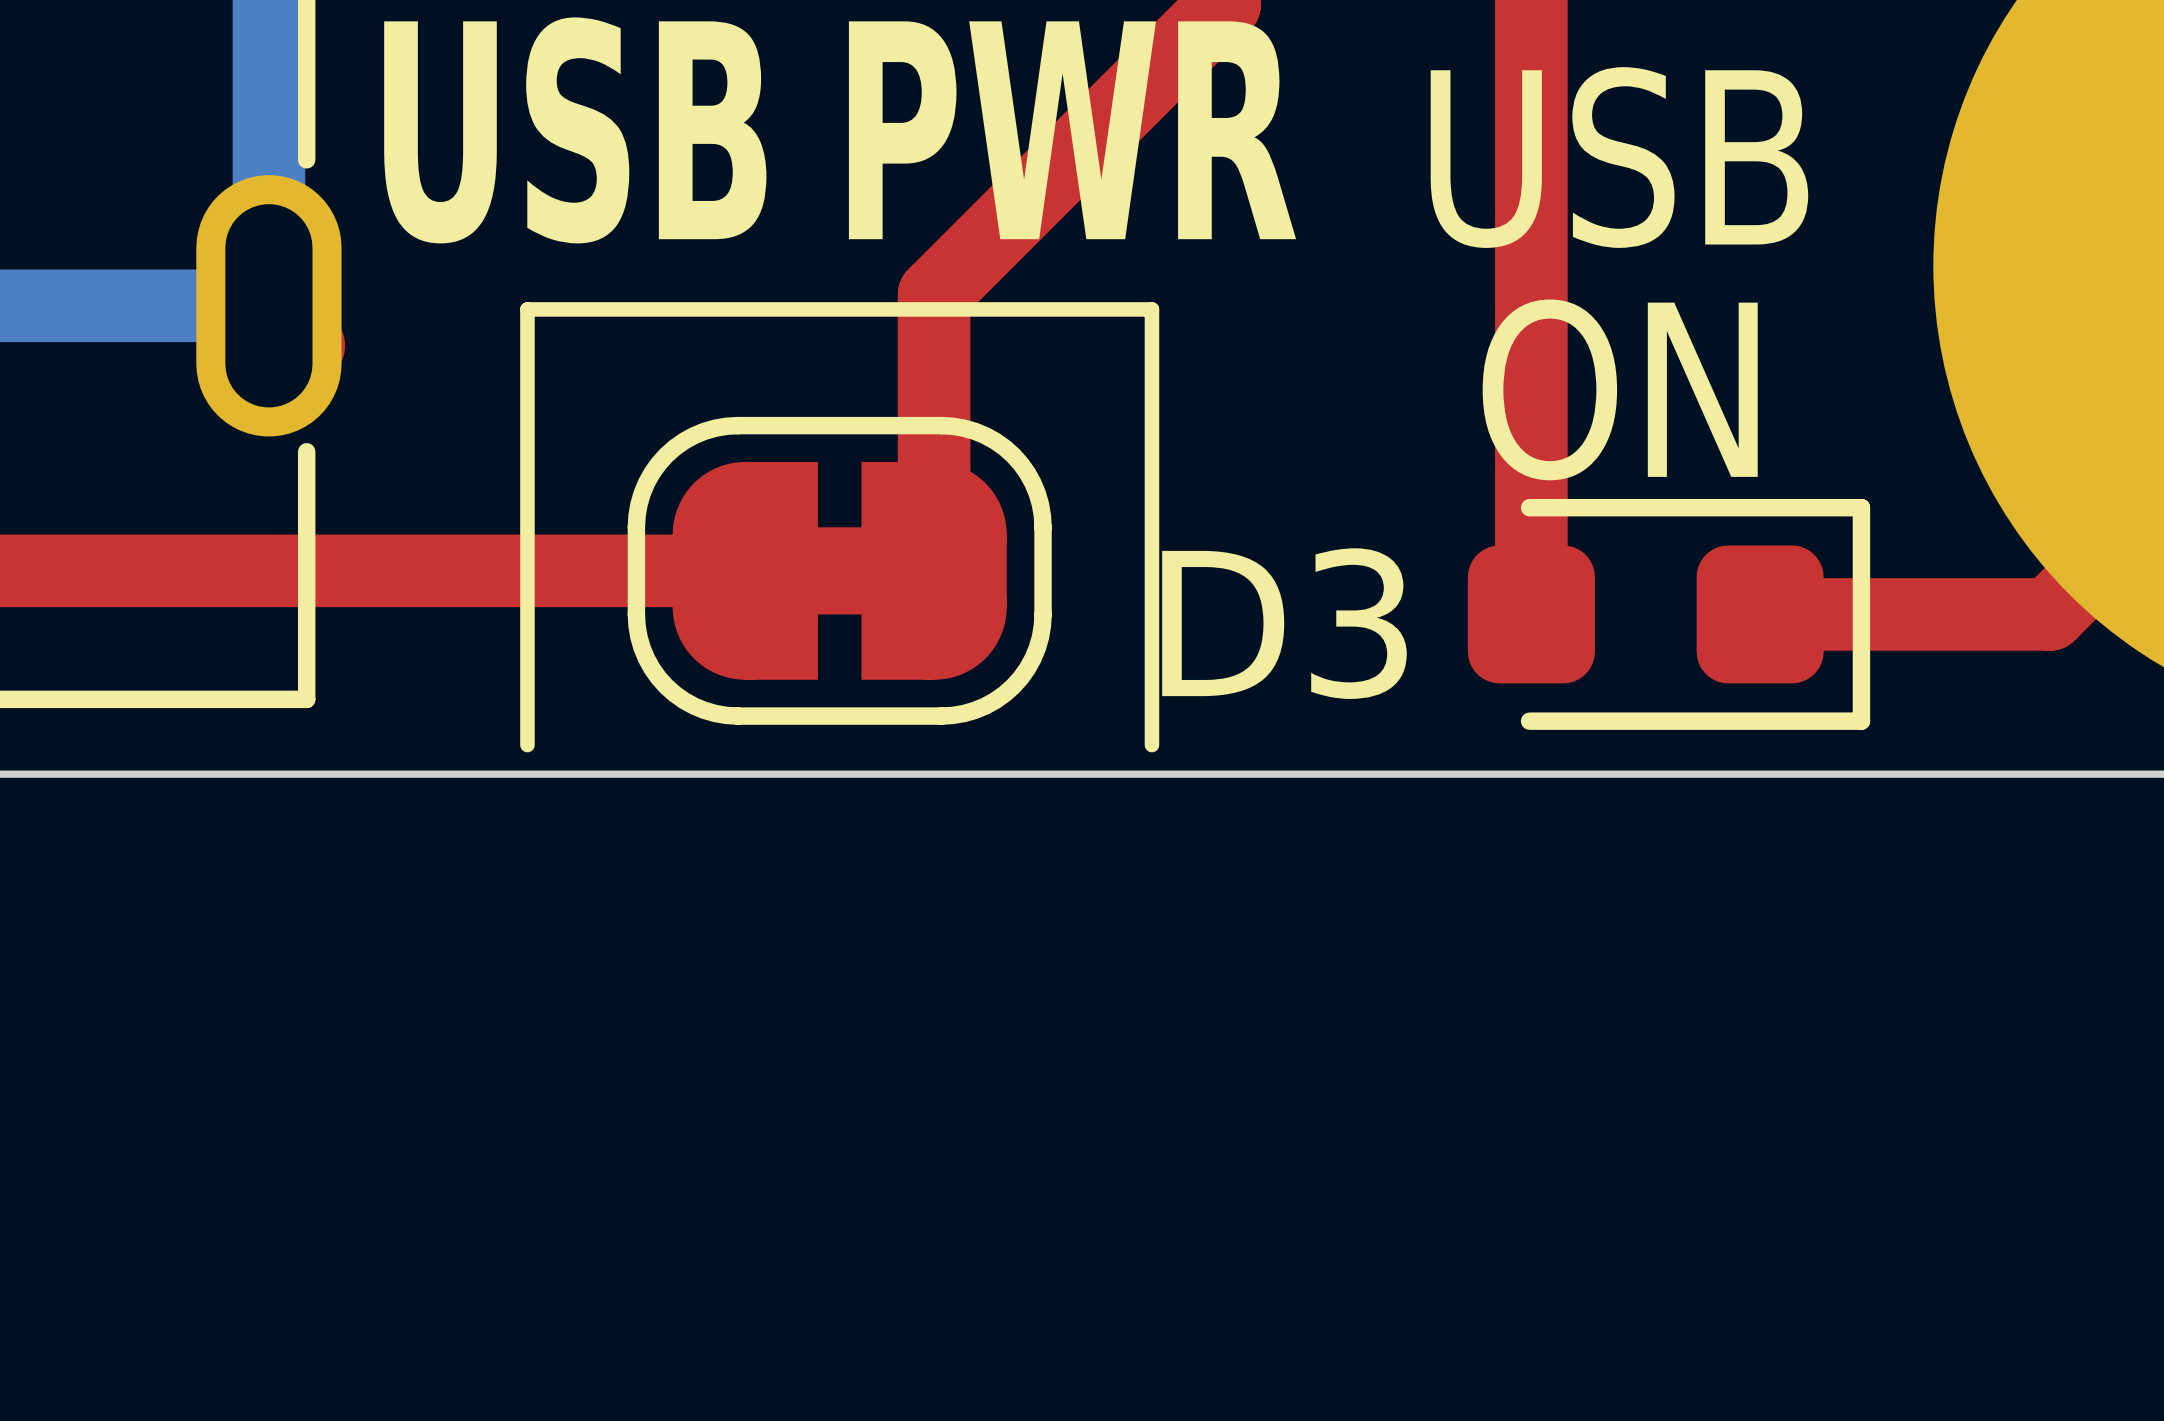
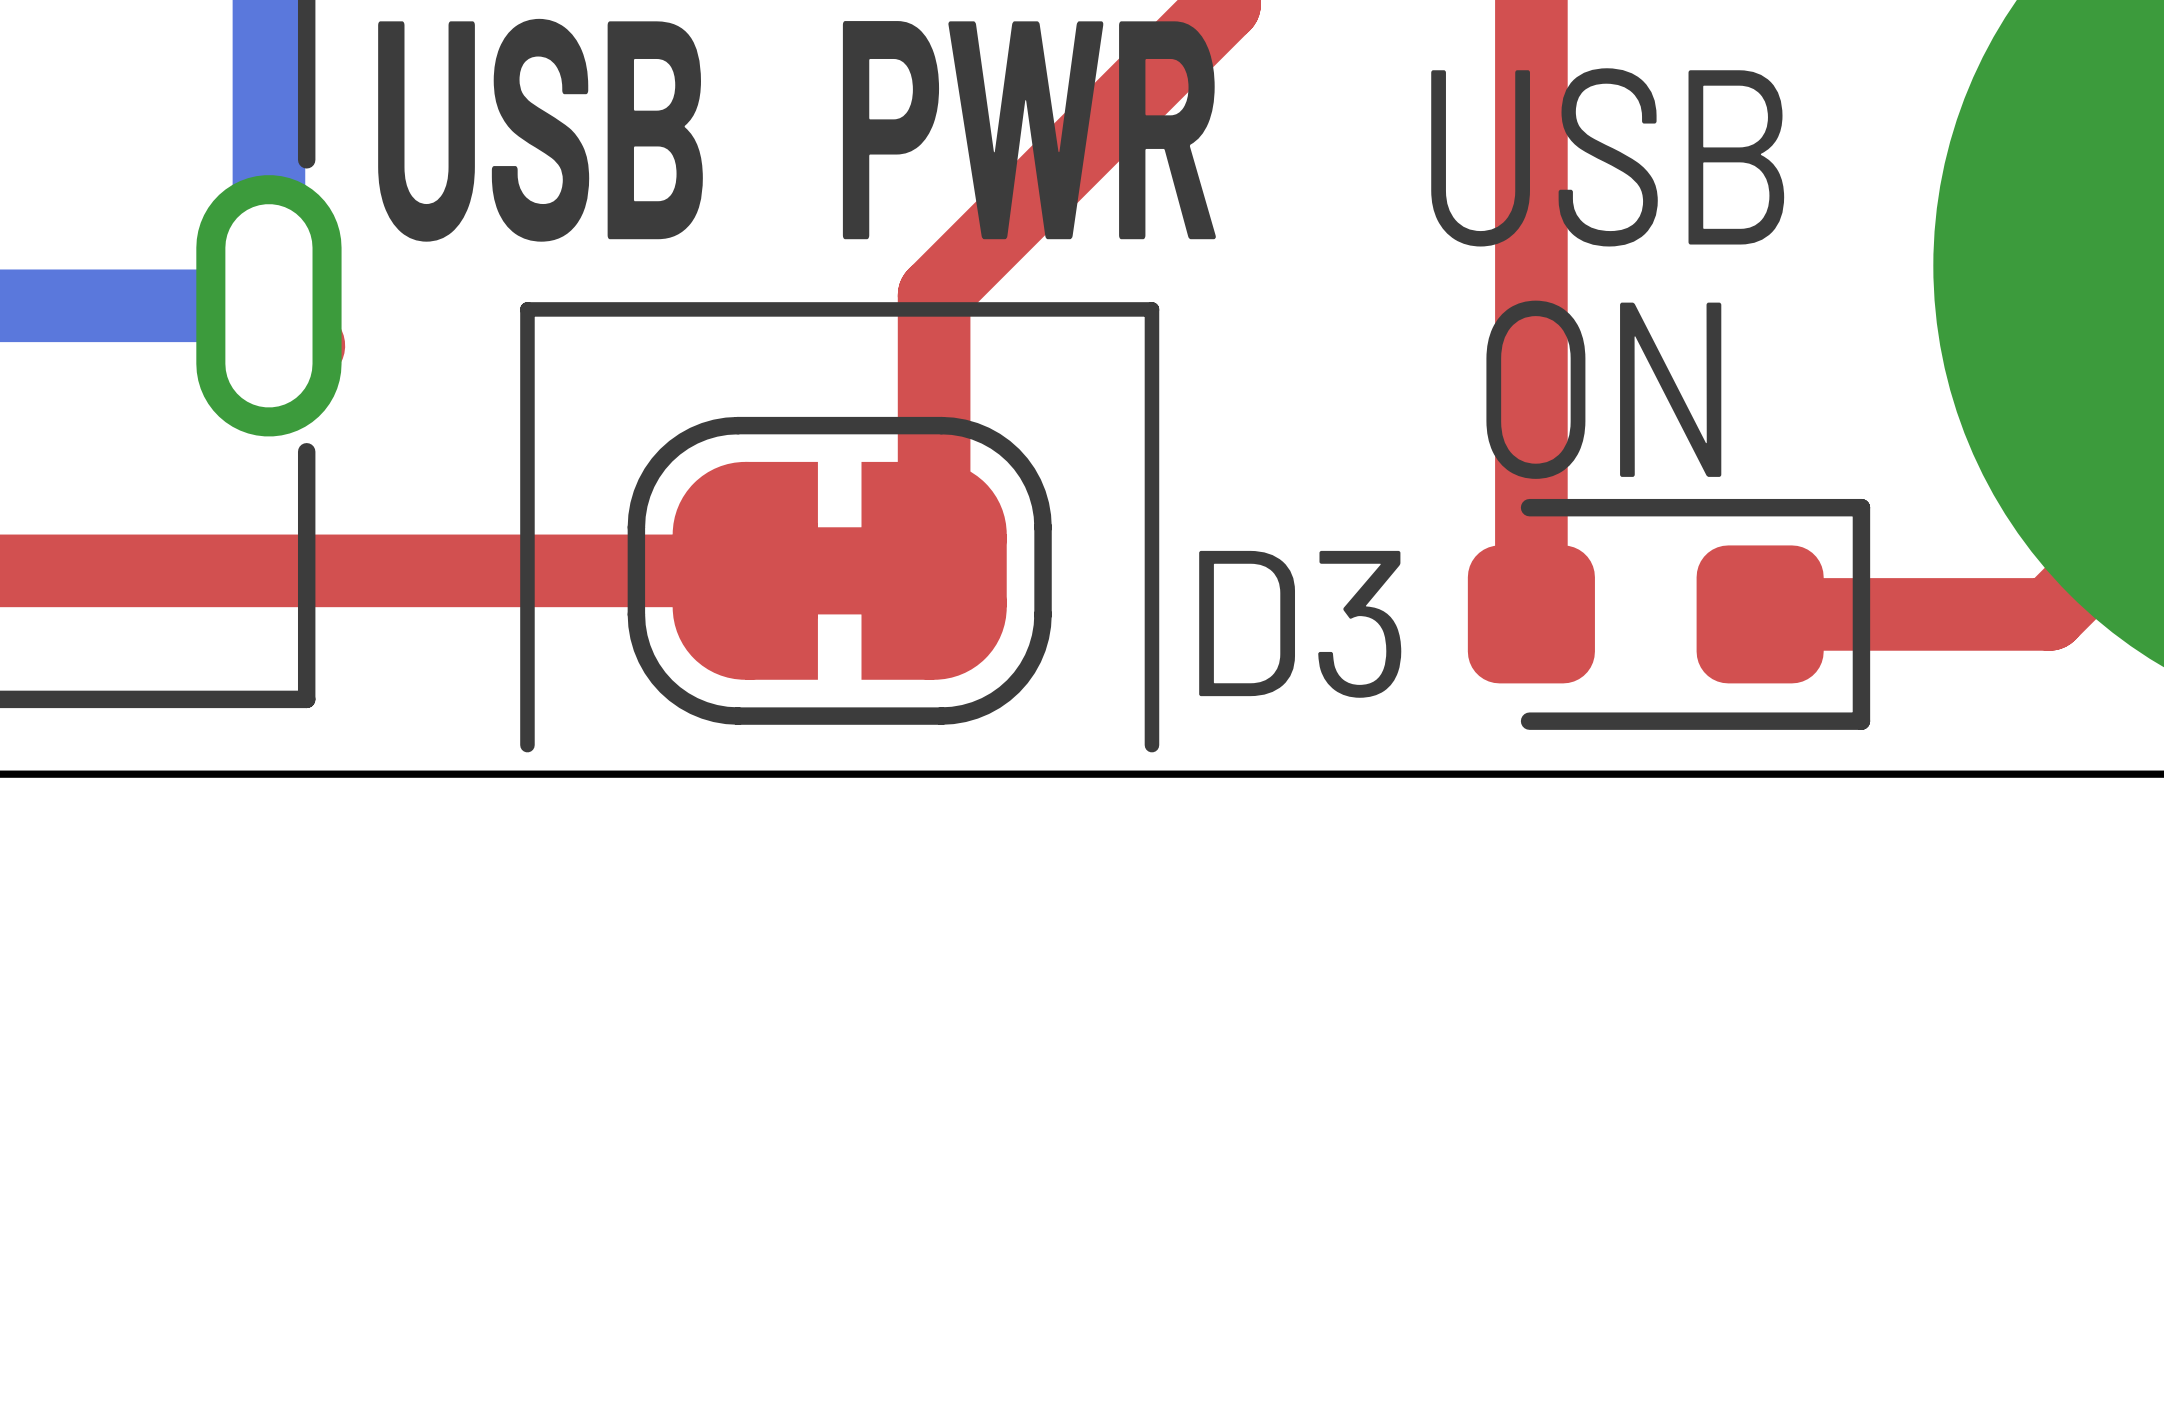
D3 name position: D3 (1284, 623) -> D3 (1300, 624)

